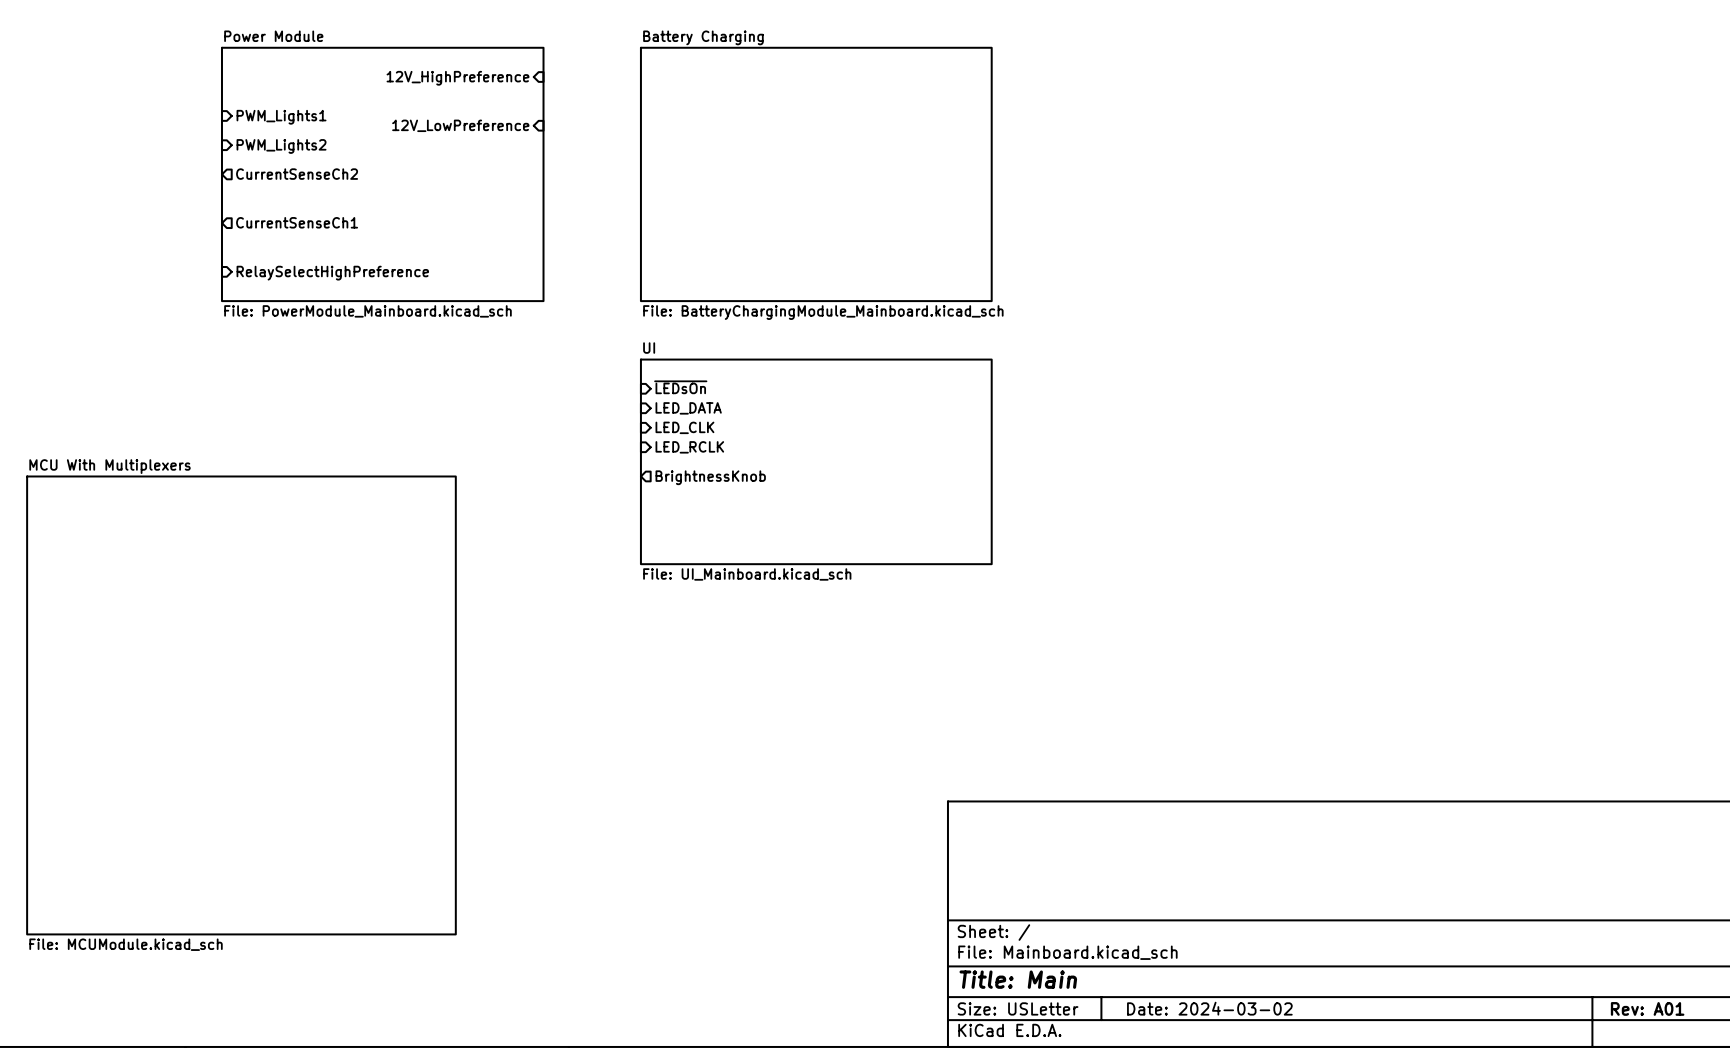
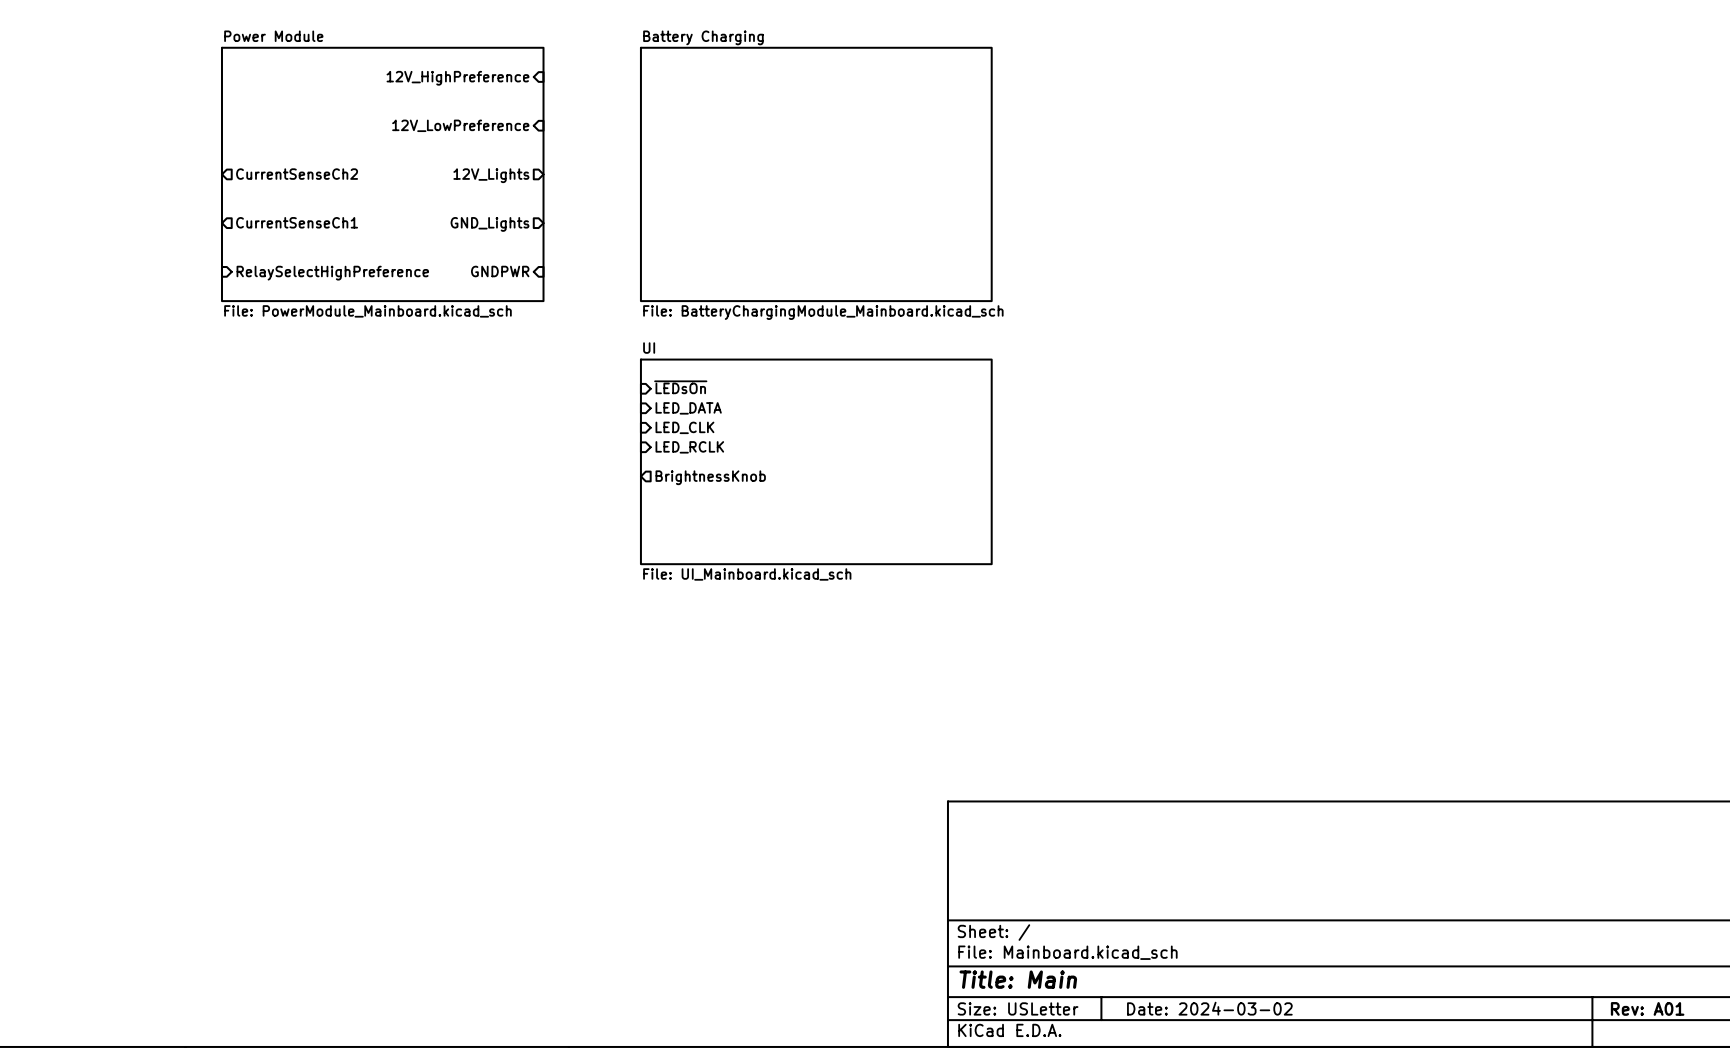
sheet pin: PWM_Lights1 (281, 117) -> none
sheet pin: PWM_Lights2 (281, 146) -> none
sheet pin: none -> 12V_Lights (491, 175)
sheet pin: none -> GND_Lights (490, 224)
sheet pin: none -> GNDPWR (500, 271)
sheet MCU With Multiplexers: File: MCUModule.kicad_sch (241, 705) -> none

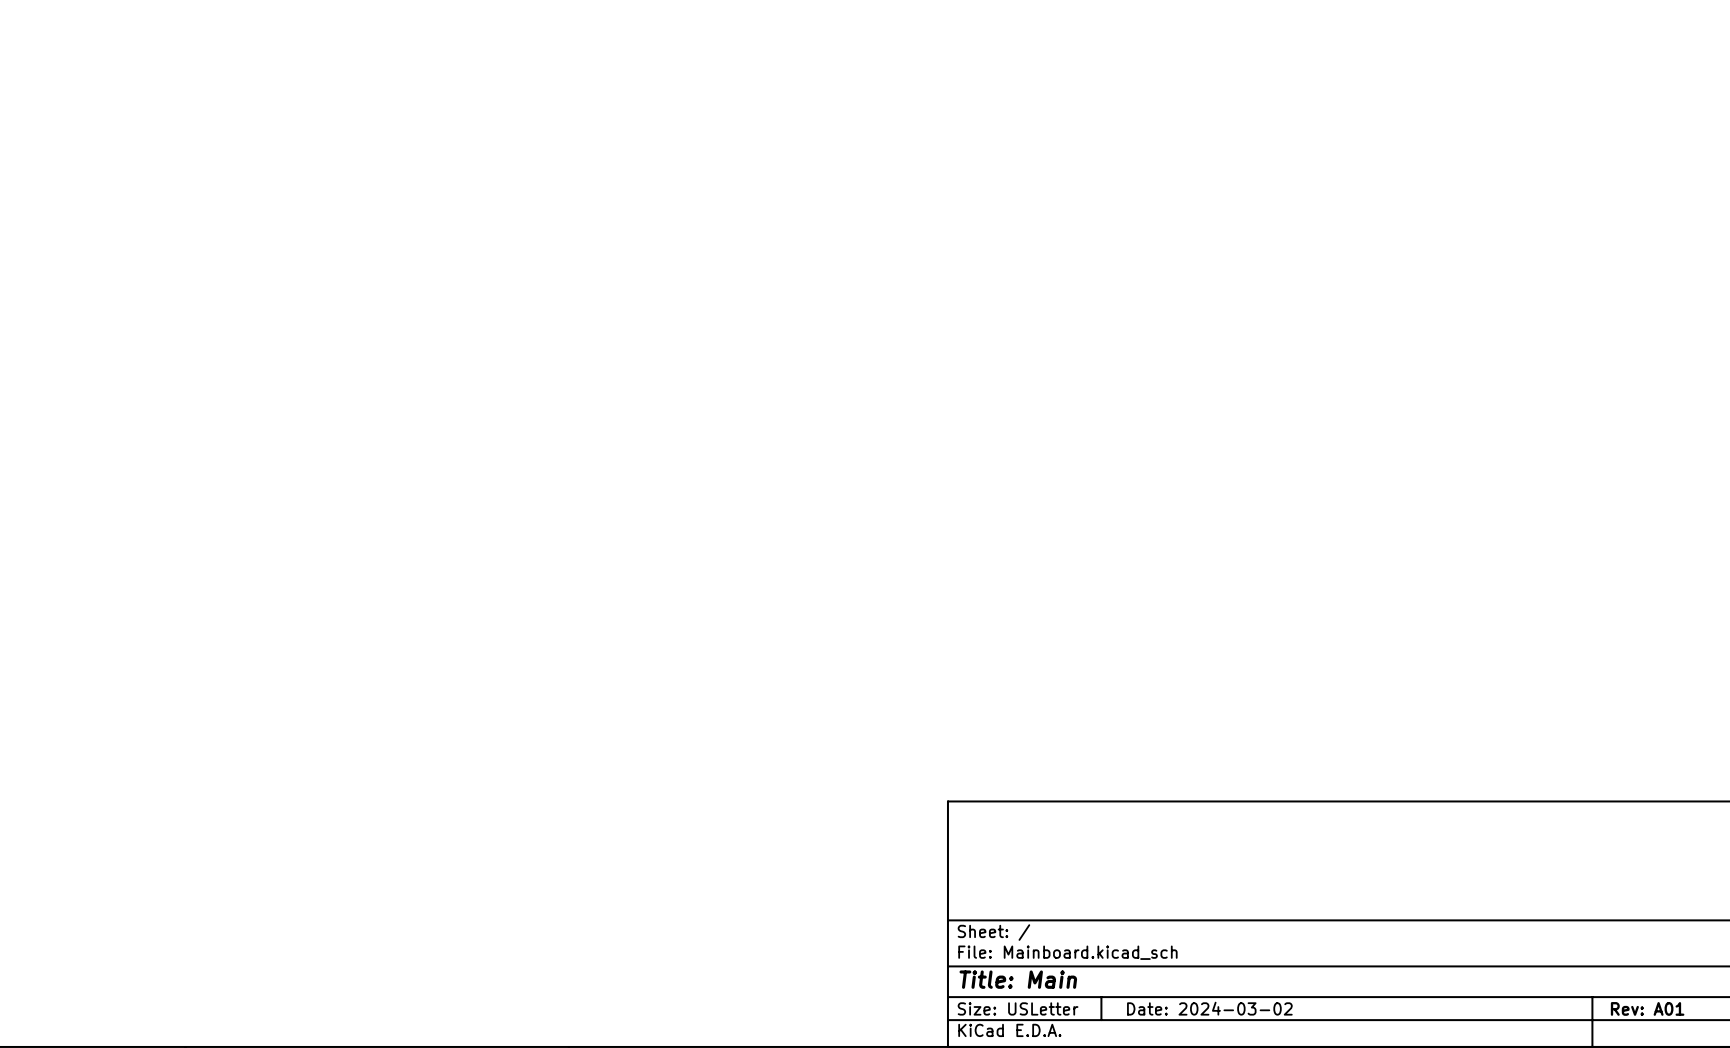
sheet pin: 12V_HighPreference (457, 78) -> none
sheet pin: 12V_LowPreference (460, 125) -> none
sheet pin: CurrentSenseCh2 (297, 174) -> none
sheet Power Module: File: PowerModule_Mainboard.kicad_sch (382, 174) -> none
sheet Battery Charging: File: BatteryChargingModule_Mainboard.kicad_sch (816, 174) -> none
sheet pin: 12V_Lights (491, 175) -> none
sheet pin: CurrentSenseCh1 (297, 222) -> none
sheet pin: GND_Lights (490, 224) -> none
sheet pin: GNDPWR (500, 271) -> none
sheet pin: RelaySelectHighPreference (332, 273) -> none
sheet pin: ~{LEDsOn} (680, 387) -> none
sheet pin: LED_DATA (688, 408) -> none
sheet pin: LED_CLK (684, 427) -> none
sheet pin: LED_RCLK (689, 447) -> none
sheet UI: File: UI_Mainboard.kicad_sch (816, 461) -> none
sheet pin: BrightnessKnob (710, 477) -> none

